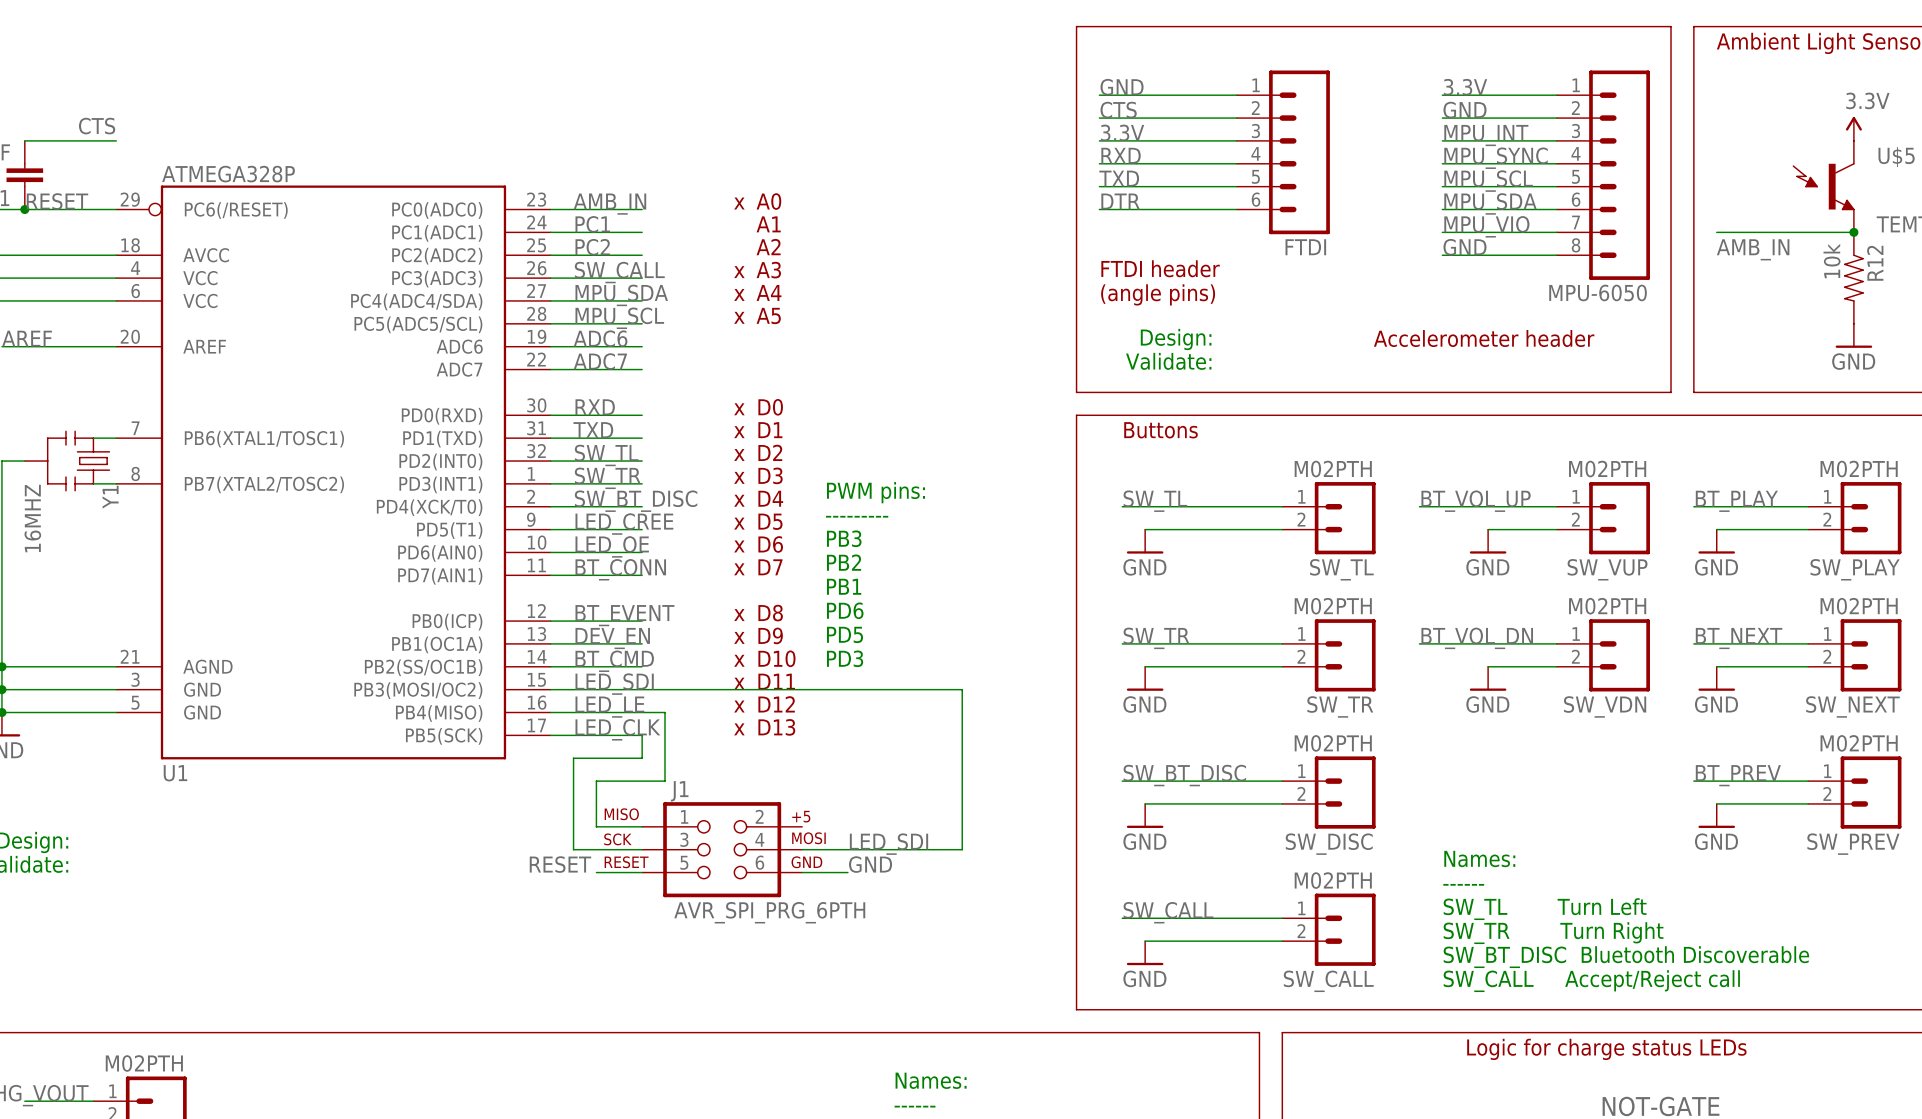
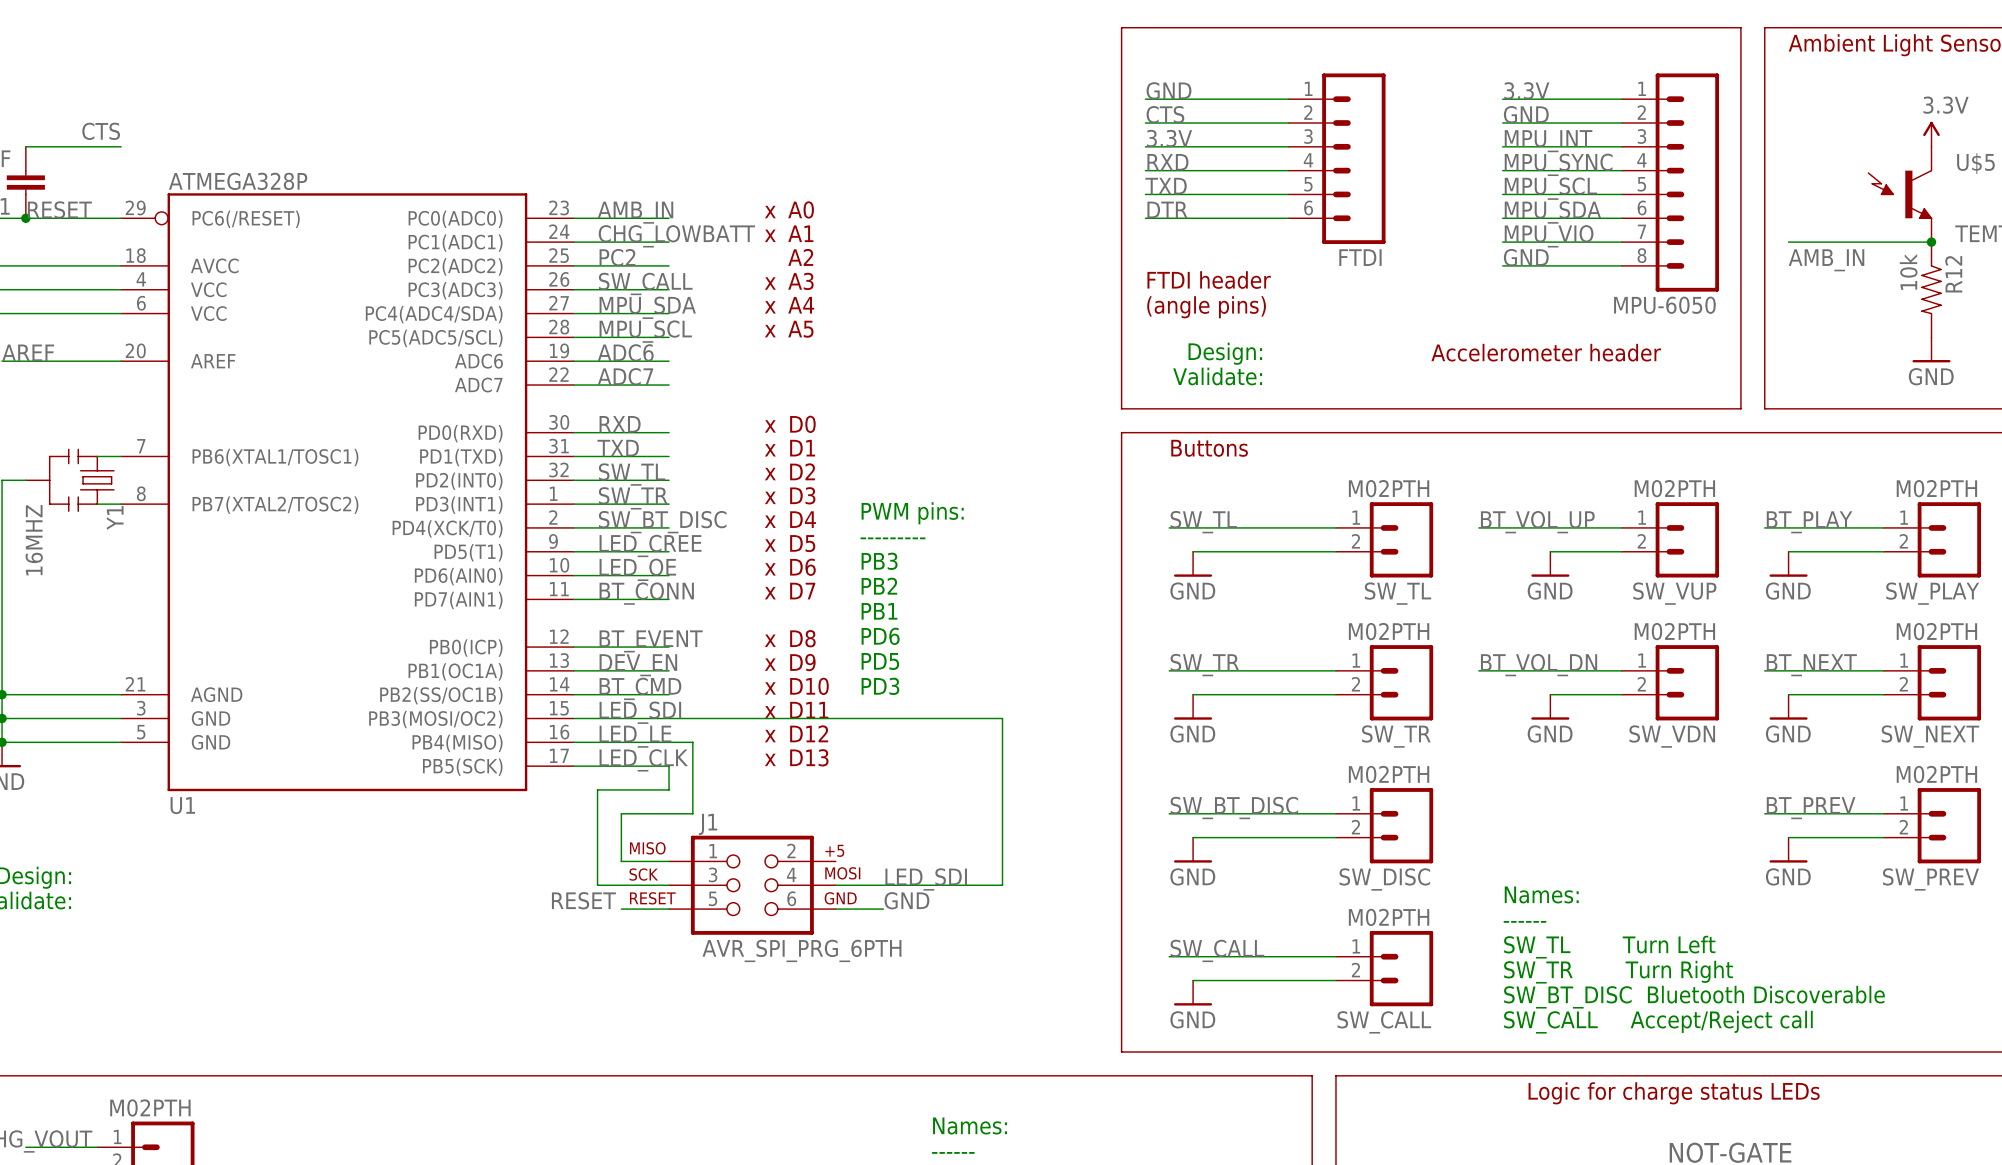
label: PC1 (592, 224) -> CHG_LOWBATT (676, 236)
text: none -> x (770, 235)

